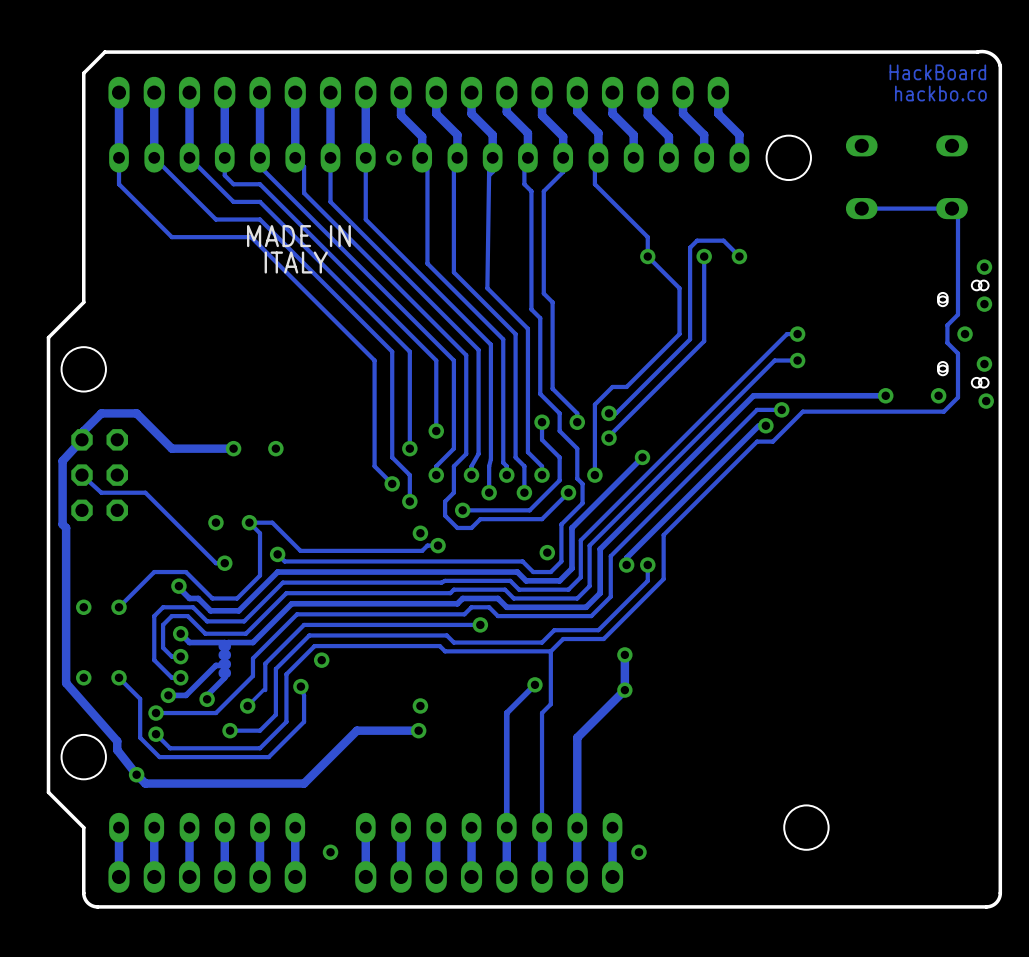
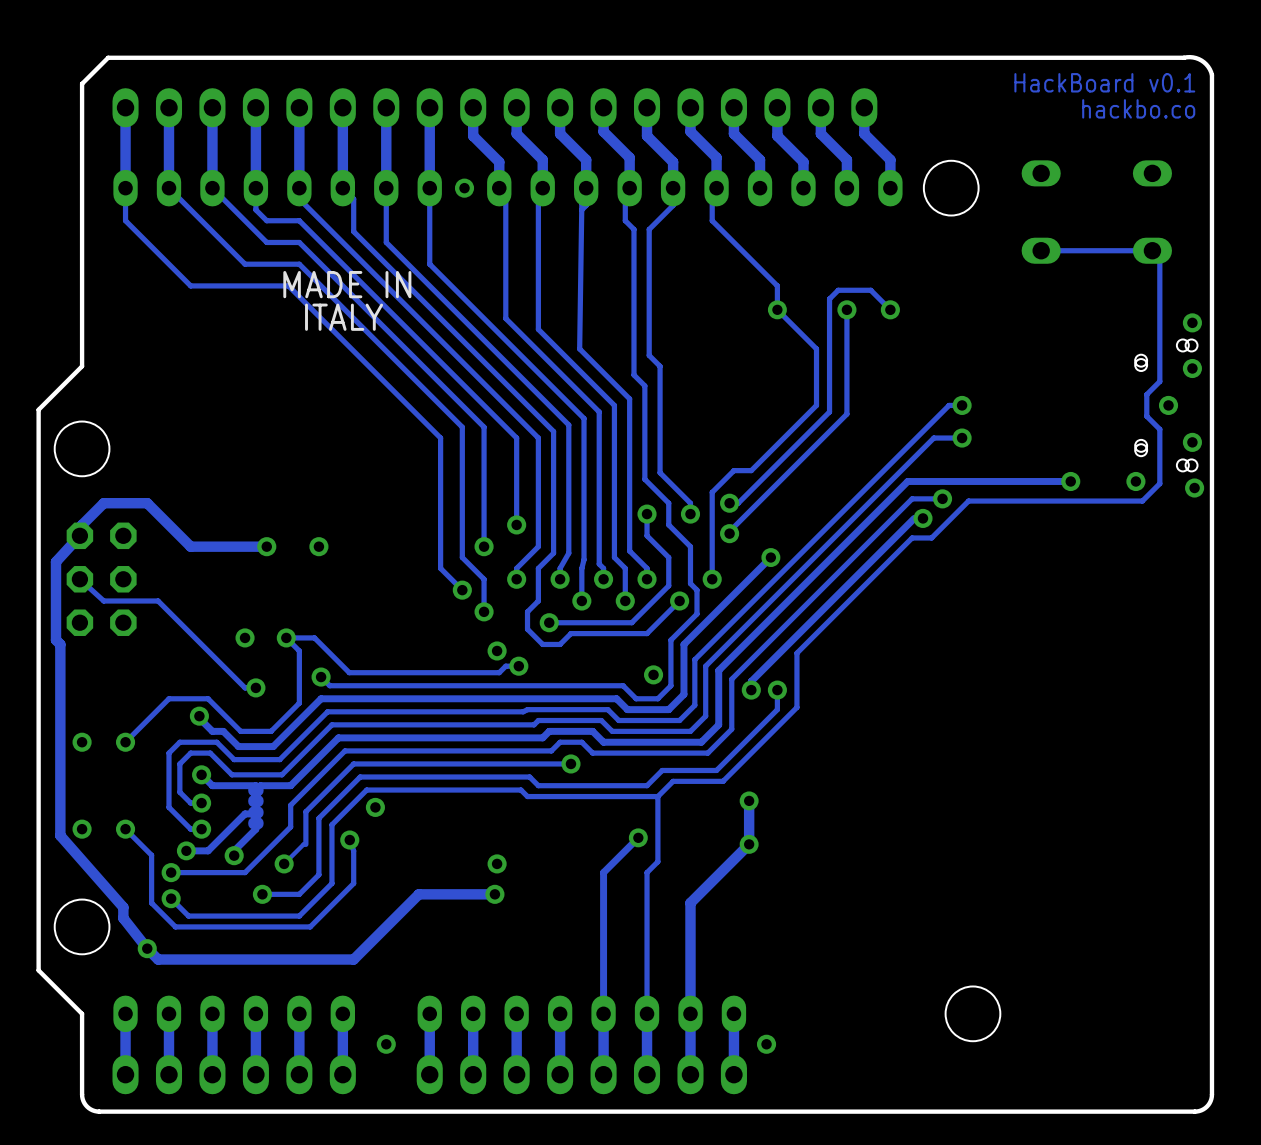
text: HackBoard (937, 72) -> HackBoard v0.1 (1104, 82)

